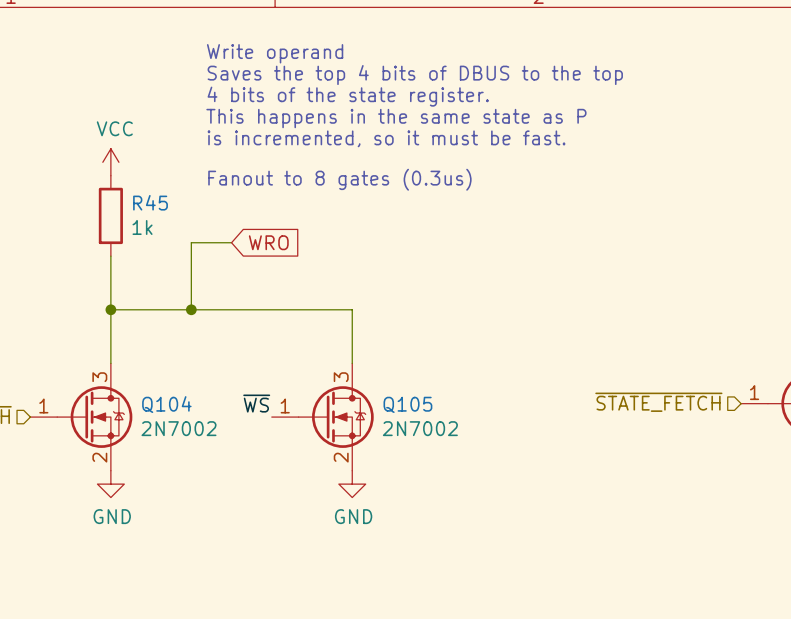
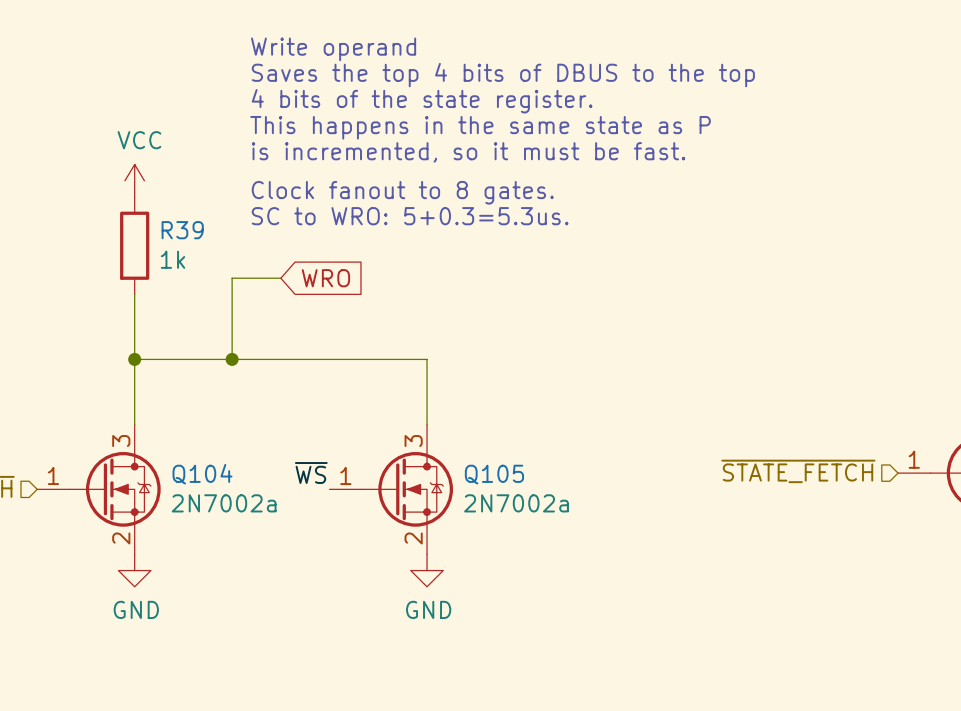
text: Fanout to 8 gates (0.3us) (339, 179) -> Clock fanout to 8 gates. (402, 192)
text: none -> SC to WRO: 5+0.3=5.3us. (410, 216)
R45 name: R45 (150, 202) -> R39 (182, 230)
Q104 value: 2N7002 (179, 428) -> 2N7002a (224, 503)
Q105 value: 2N7002 (420, 428) -> 2N7002a (516, 503)

